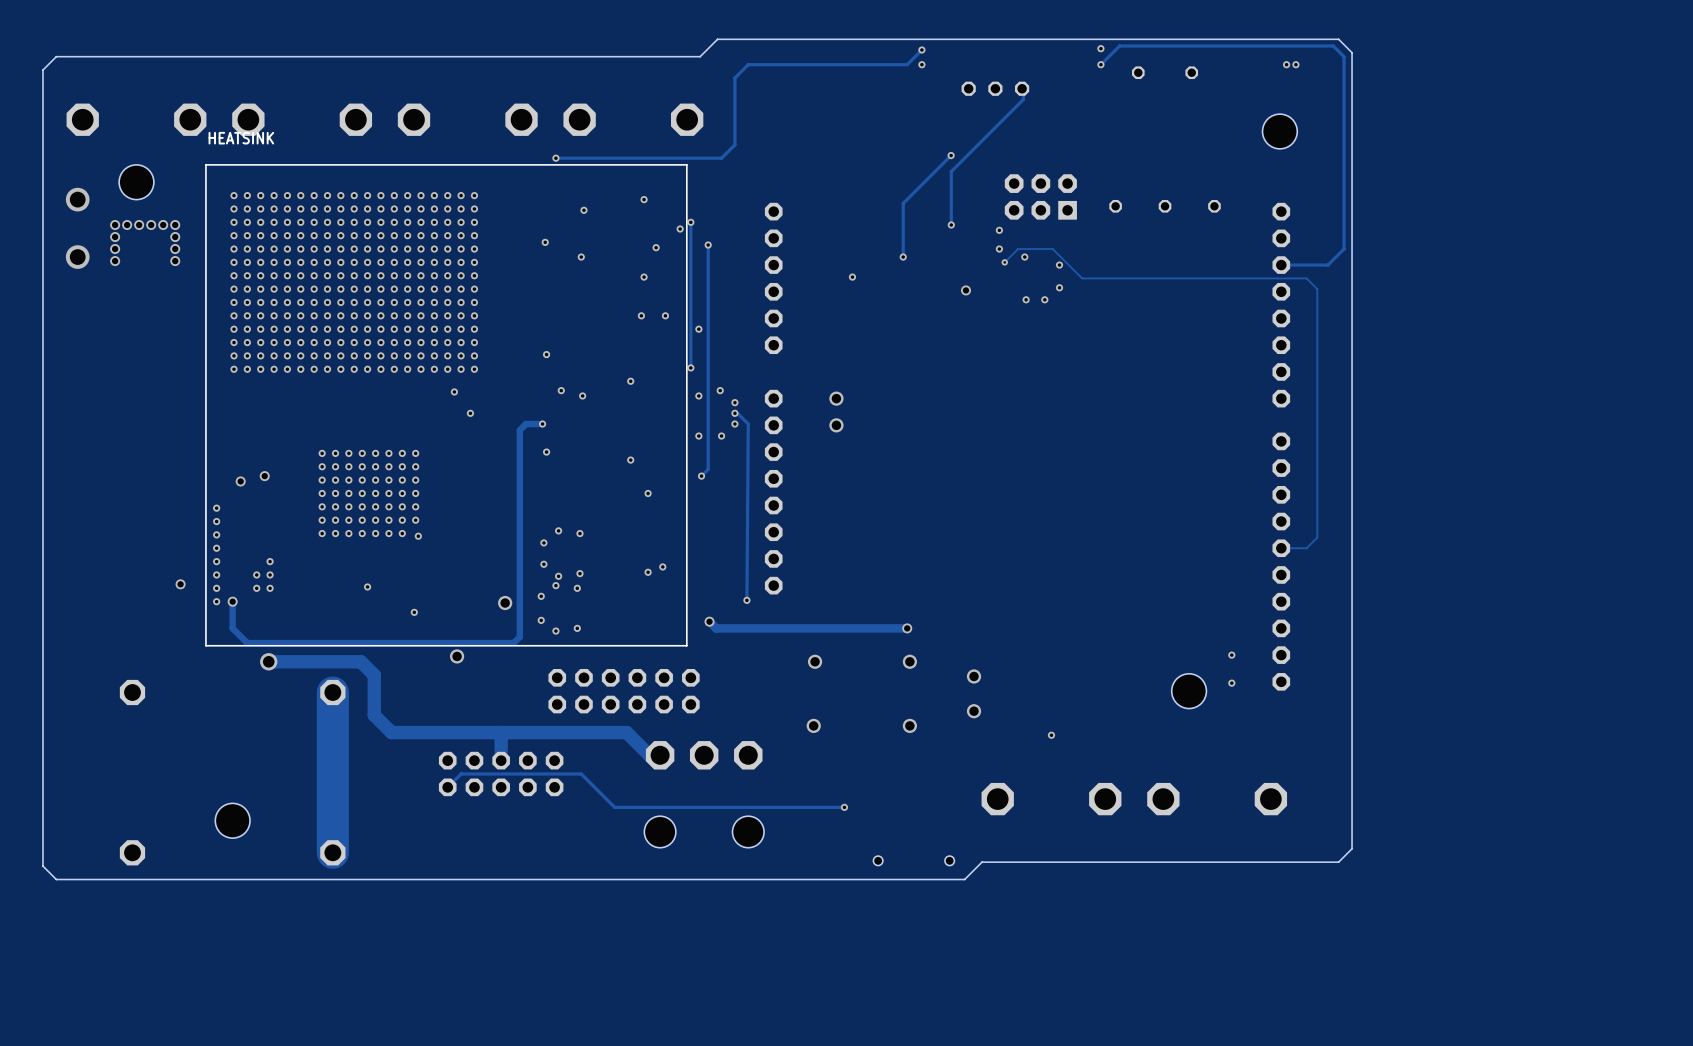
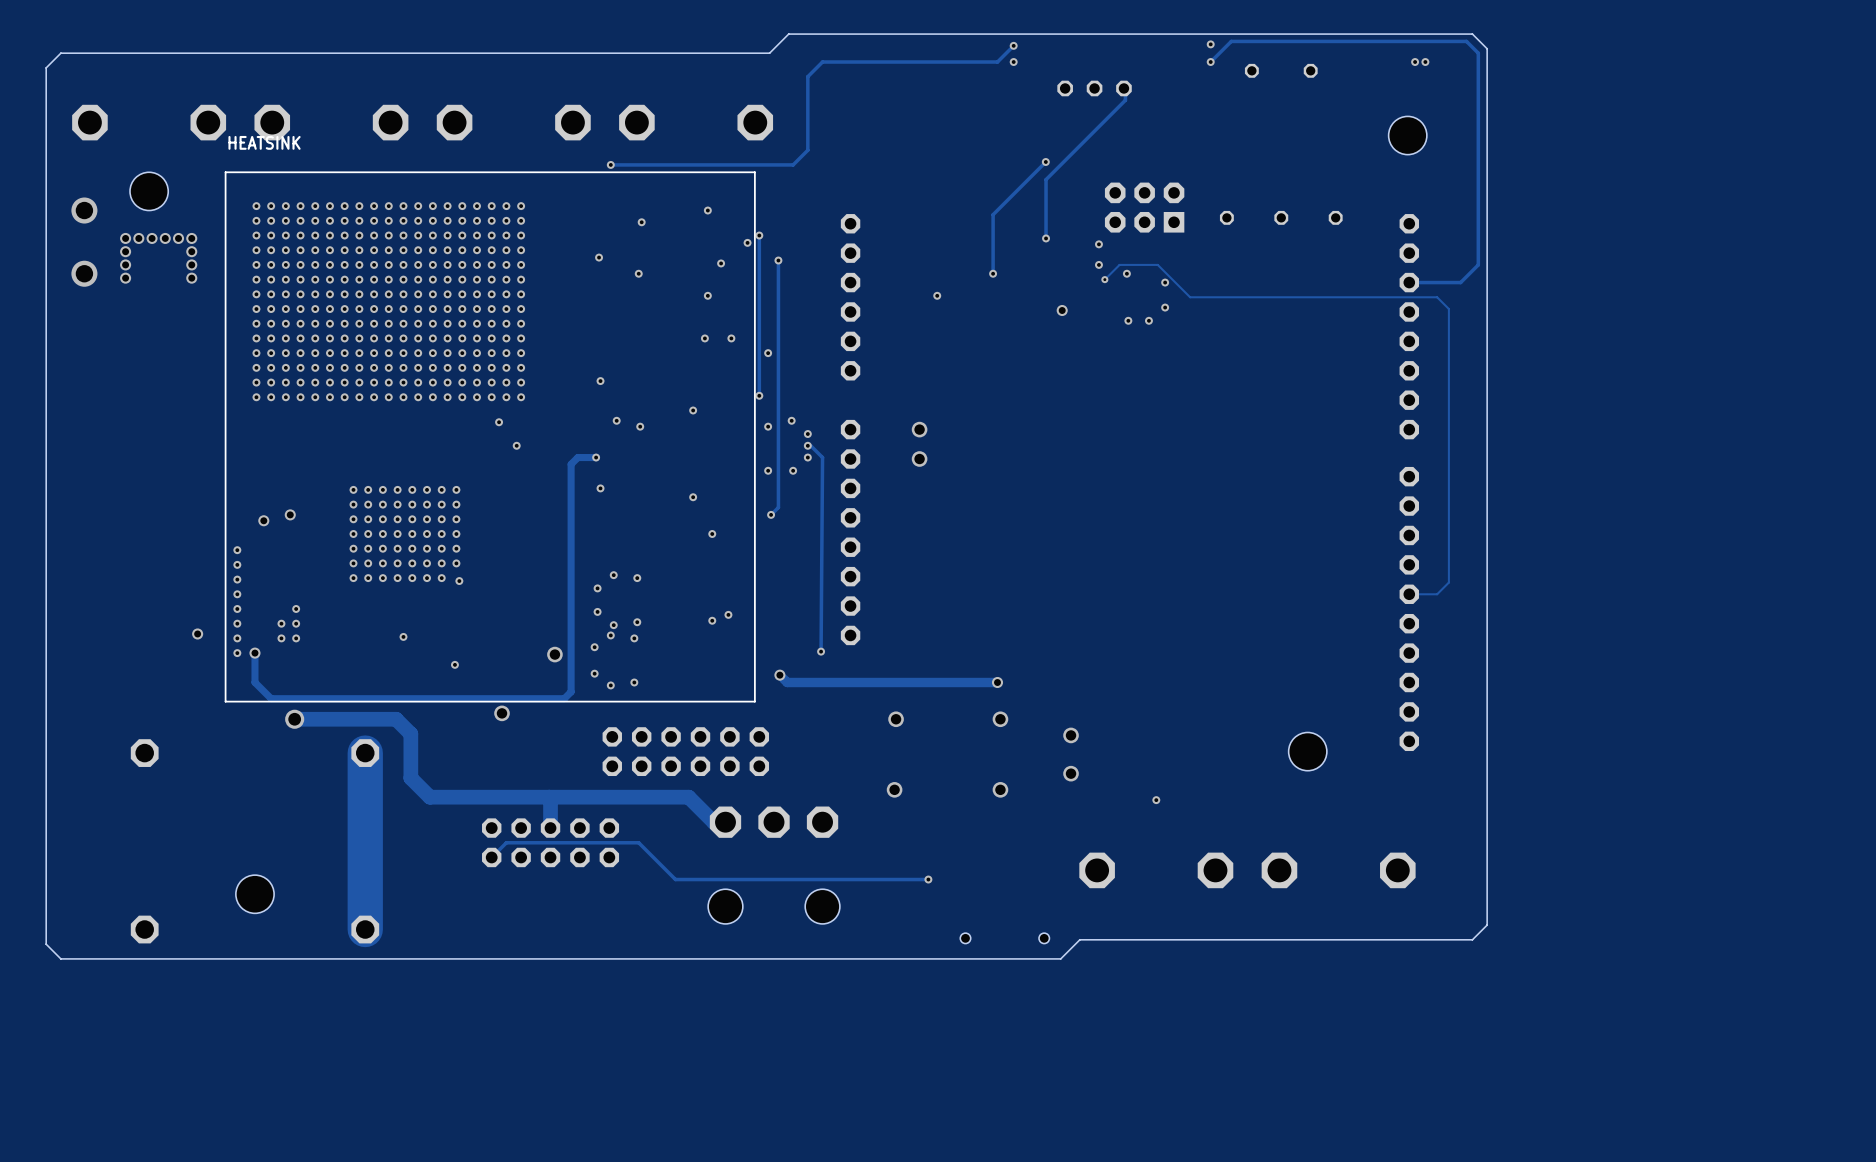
via: (1231, 655) -> none
via: (1231, 683) -> none

